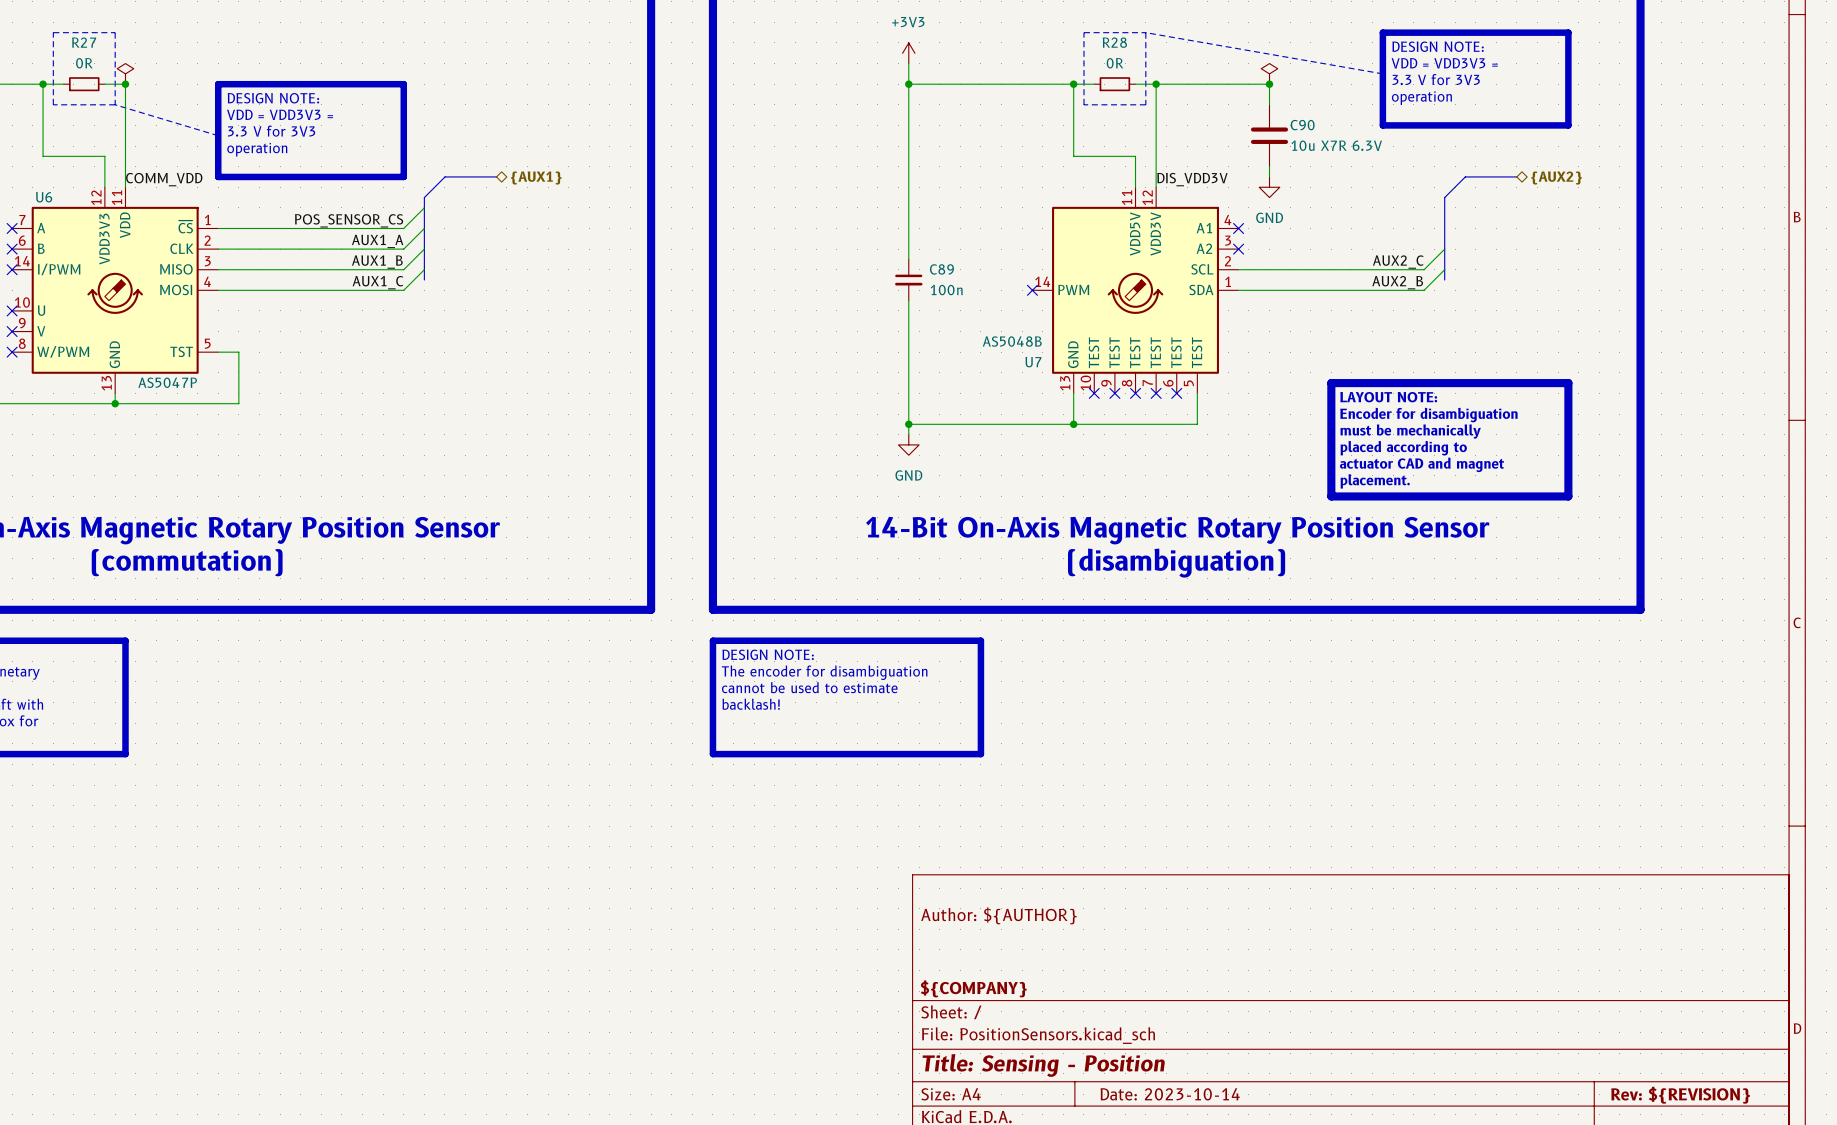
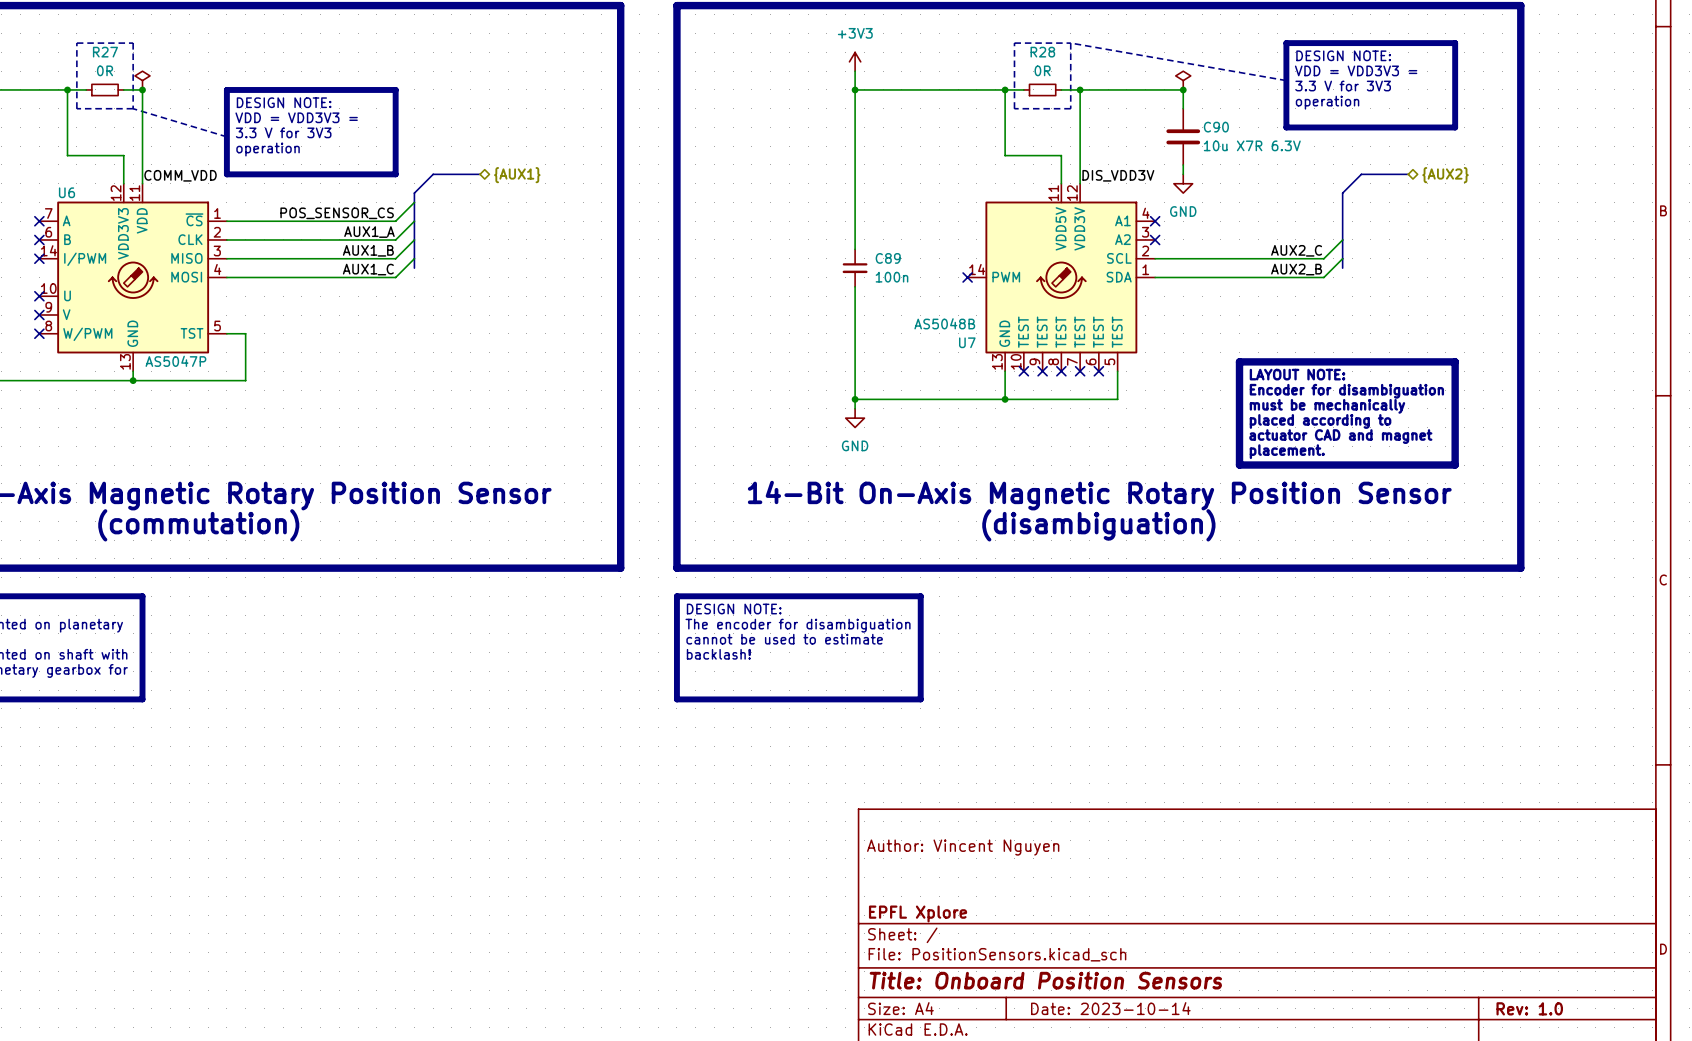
title block: Author: ${AUTHOR} (998, 915) -> Author: Vincent Nguyen (963, 847)
title block: ${COMPANY} (973, 988) -> EPFL Xplore (918, 913)
title block: Title: Sensing - Position (1043, 1065) -> Title: Onboard Position Sensors (1045, 980)
title block: Rev: ${REVISION} (1680, 1095) -> Rev: 1.0 (1529, 1008)

